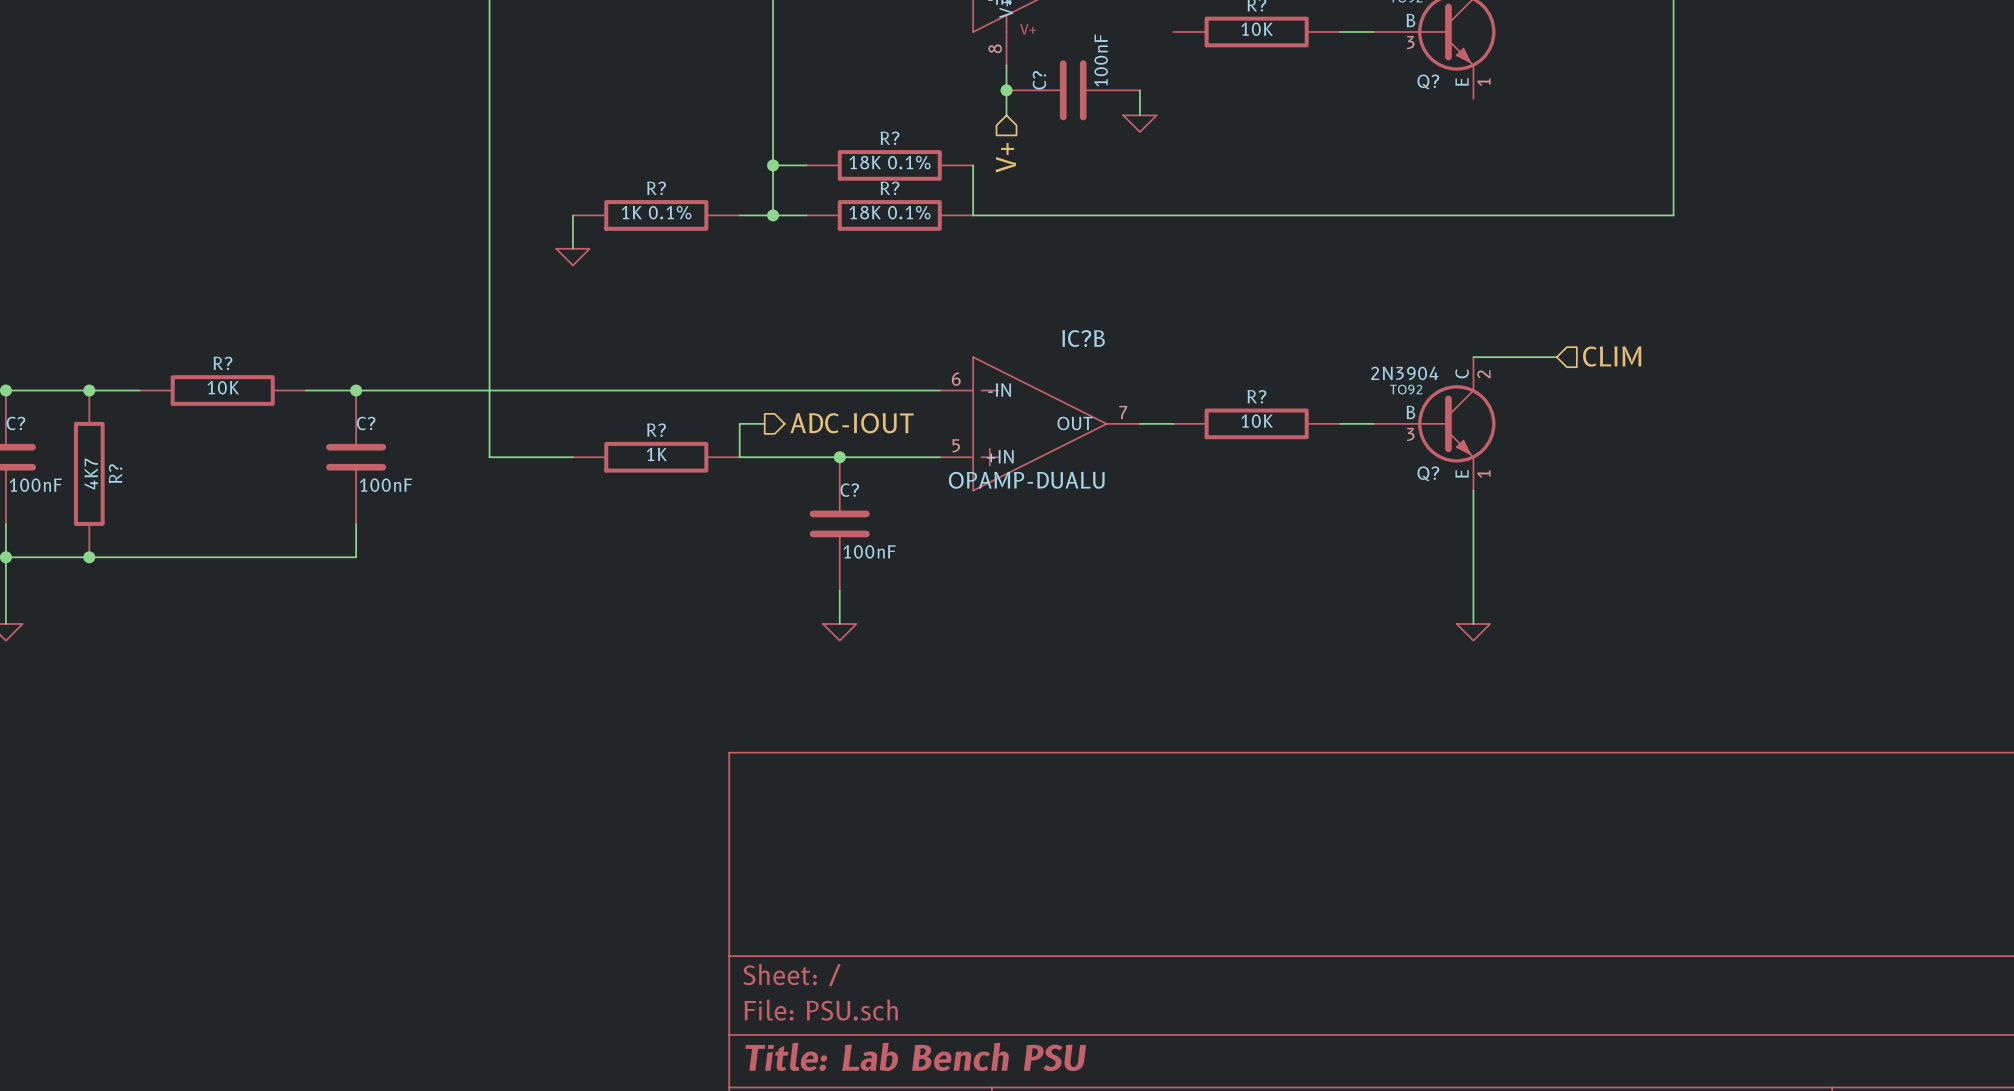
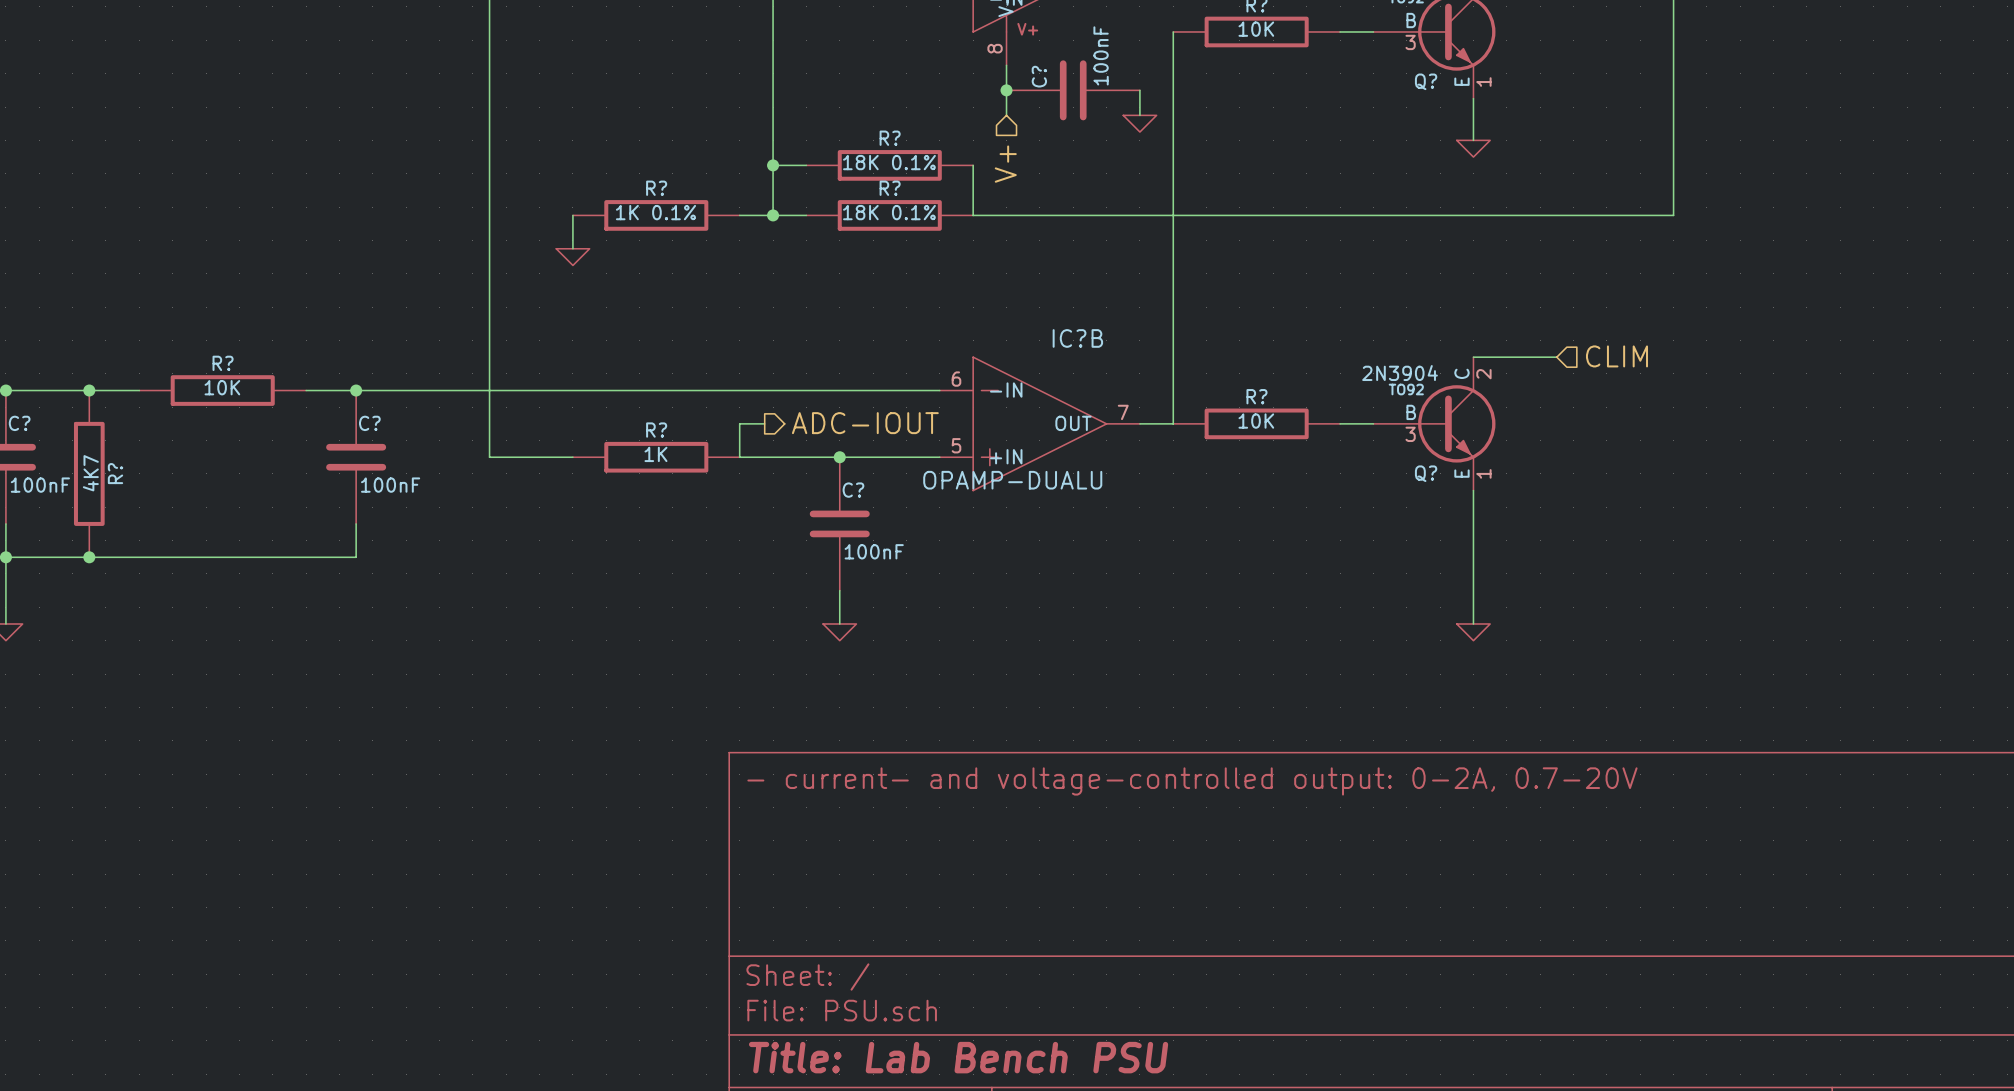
wire: none -> (1173, 31) (1173, 423)
wire: none -> (1473, 98) (1473, 140)
power symbol: none -> (1473, 148)
title block: none -> - current- and voltage-controlled output: 0-2A, 0.7-20V (1192, 781)

